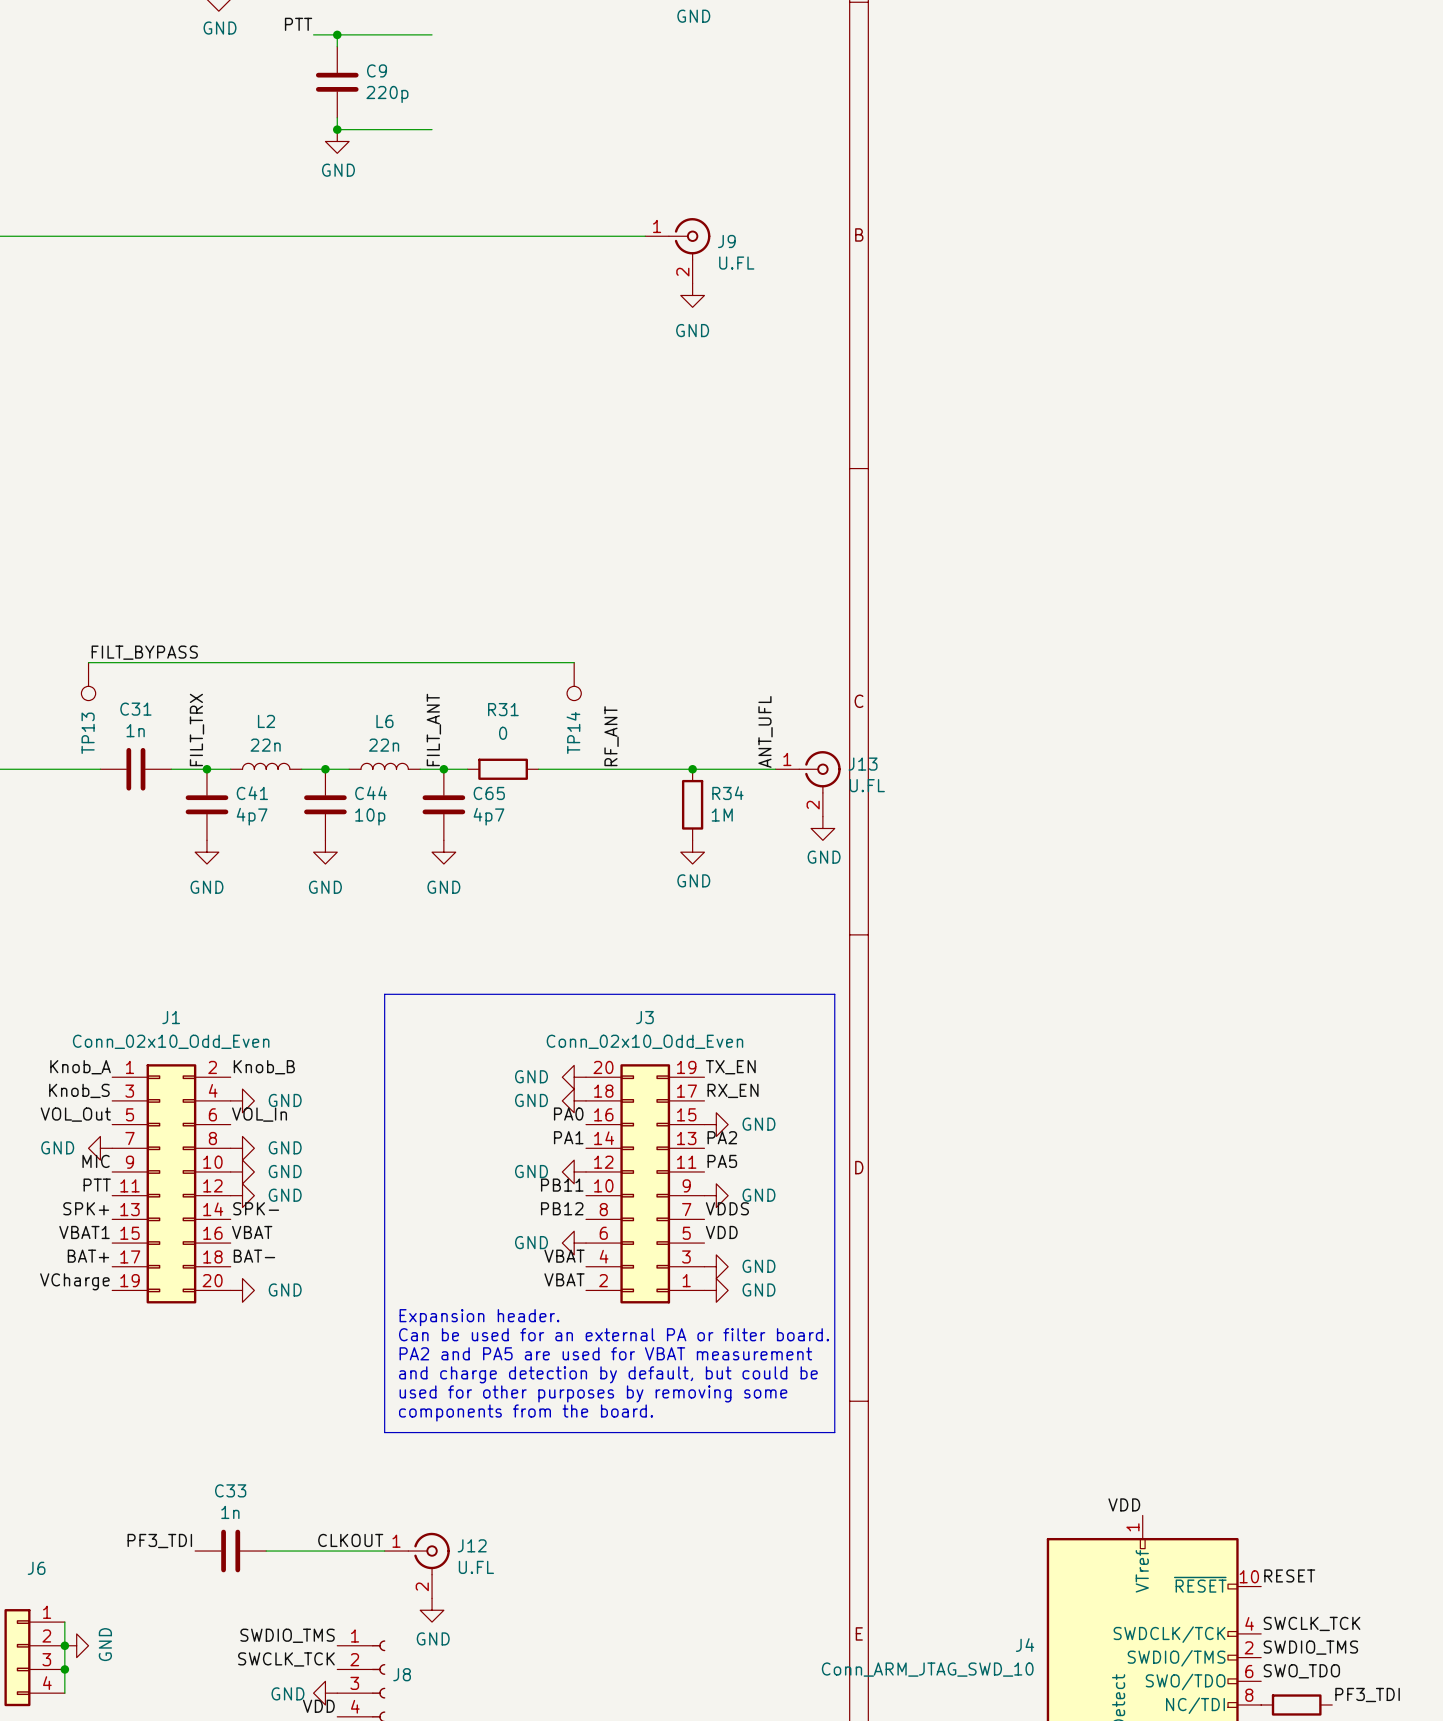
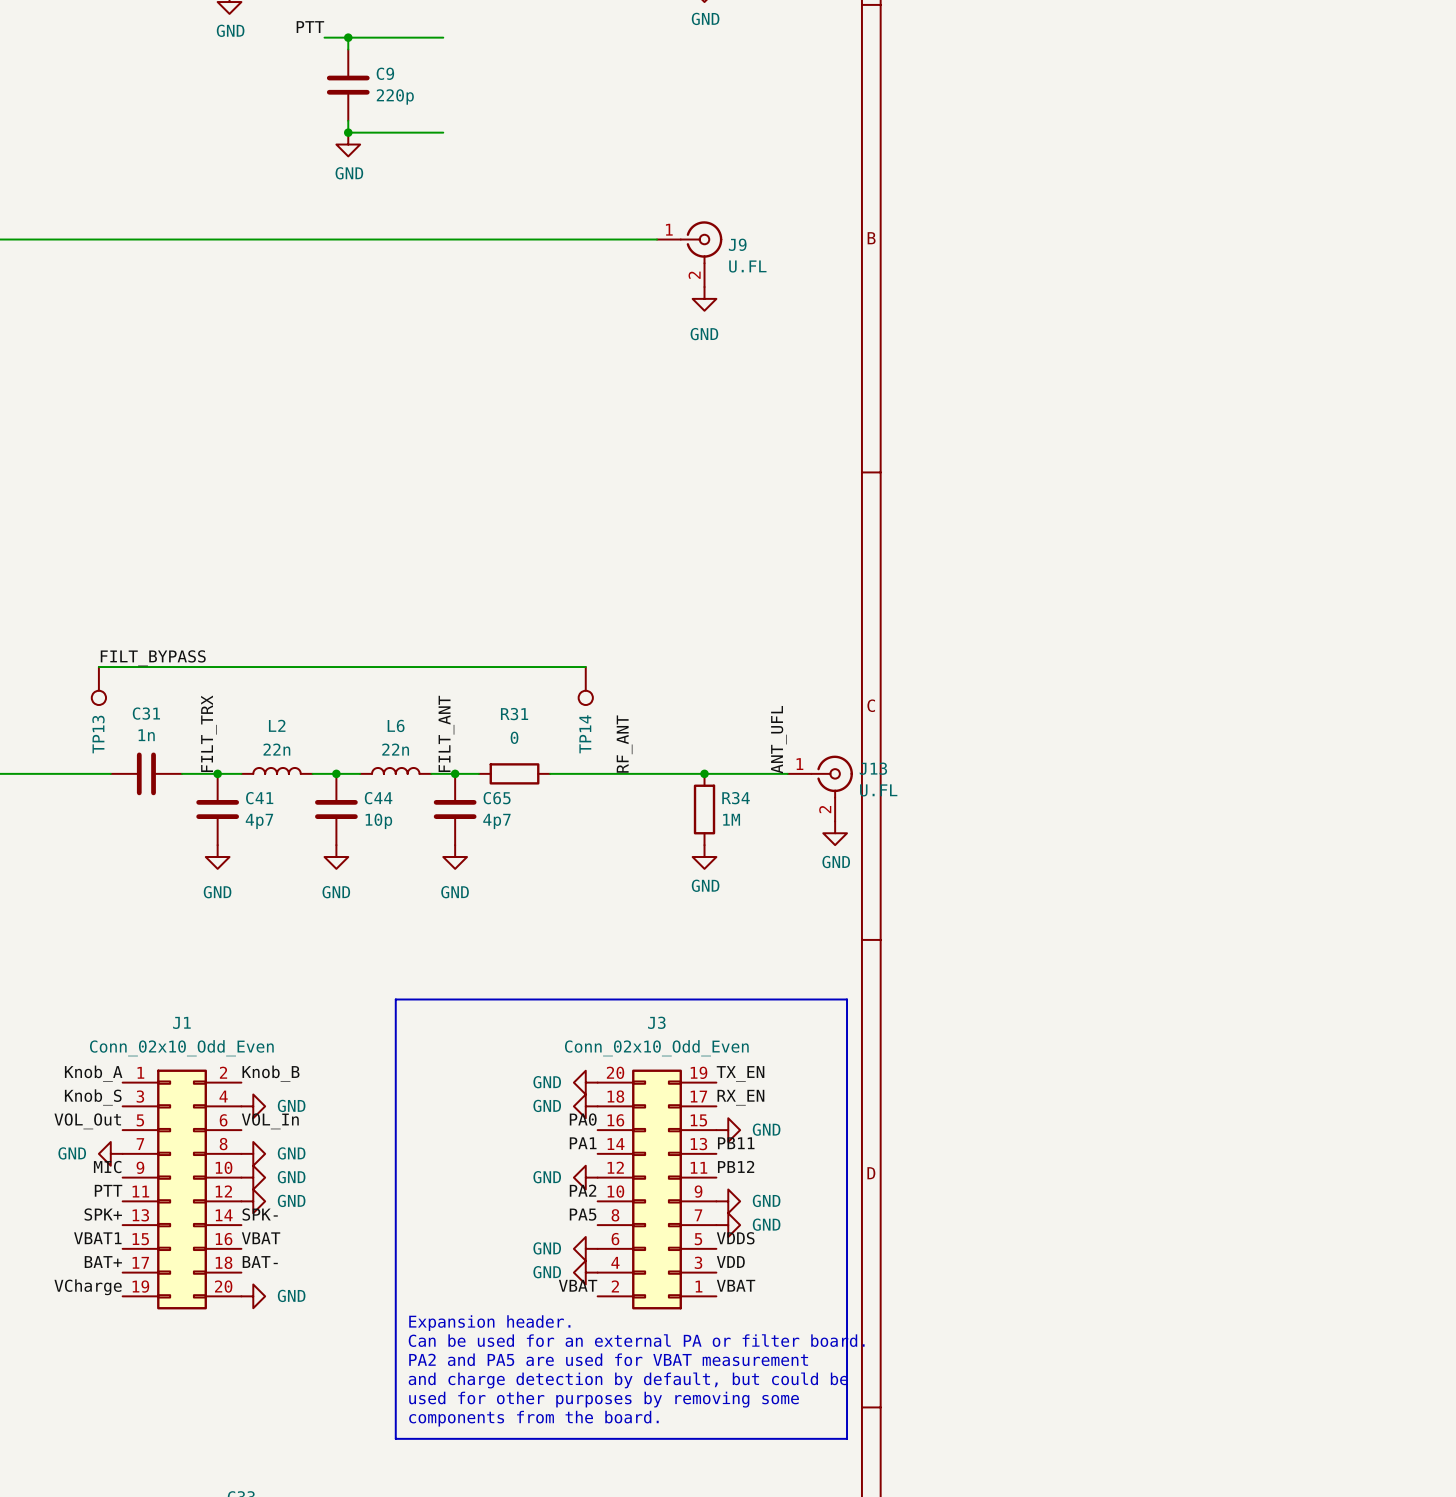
label: PA2 (722, 1137) -> PB11 (736, 1143)
label: PA5 (722, 1161) -> PB12 (736, 1166)
label: PB11 (562, 1185) -> PA2 (583, 1190)
label: PB12 (562, 1208) -> PA5 (583, 1214)
label: VDDS (727, 1208) -> none
power symbol: none -> GND (728, 1225)
label: VDD (721, 1232) -> VDDS (735, 1238)
label position: VBAT (564, 1256) -> VBAT (736, 1285)
label: none -> VDD (730, 1262)
power symbol: none -> GND (585, 1272)
power symbol: GND (716, 1266) -> none
power symbol: GND (716, 1290) -> none

